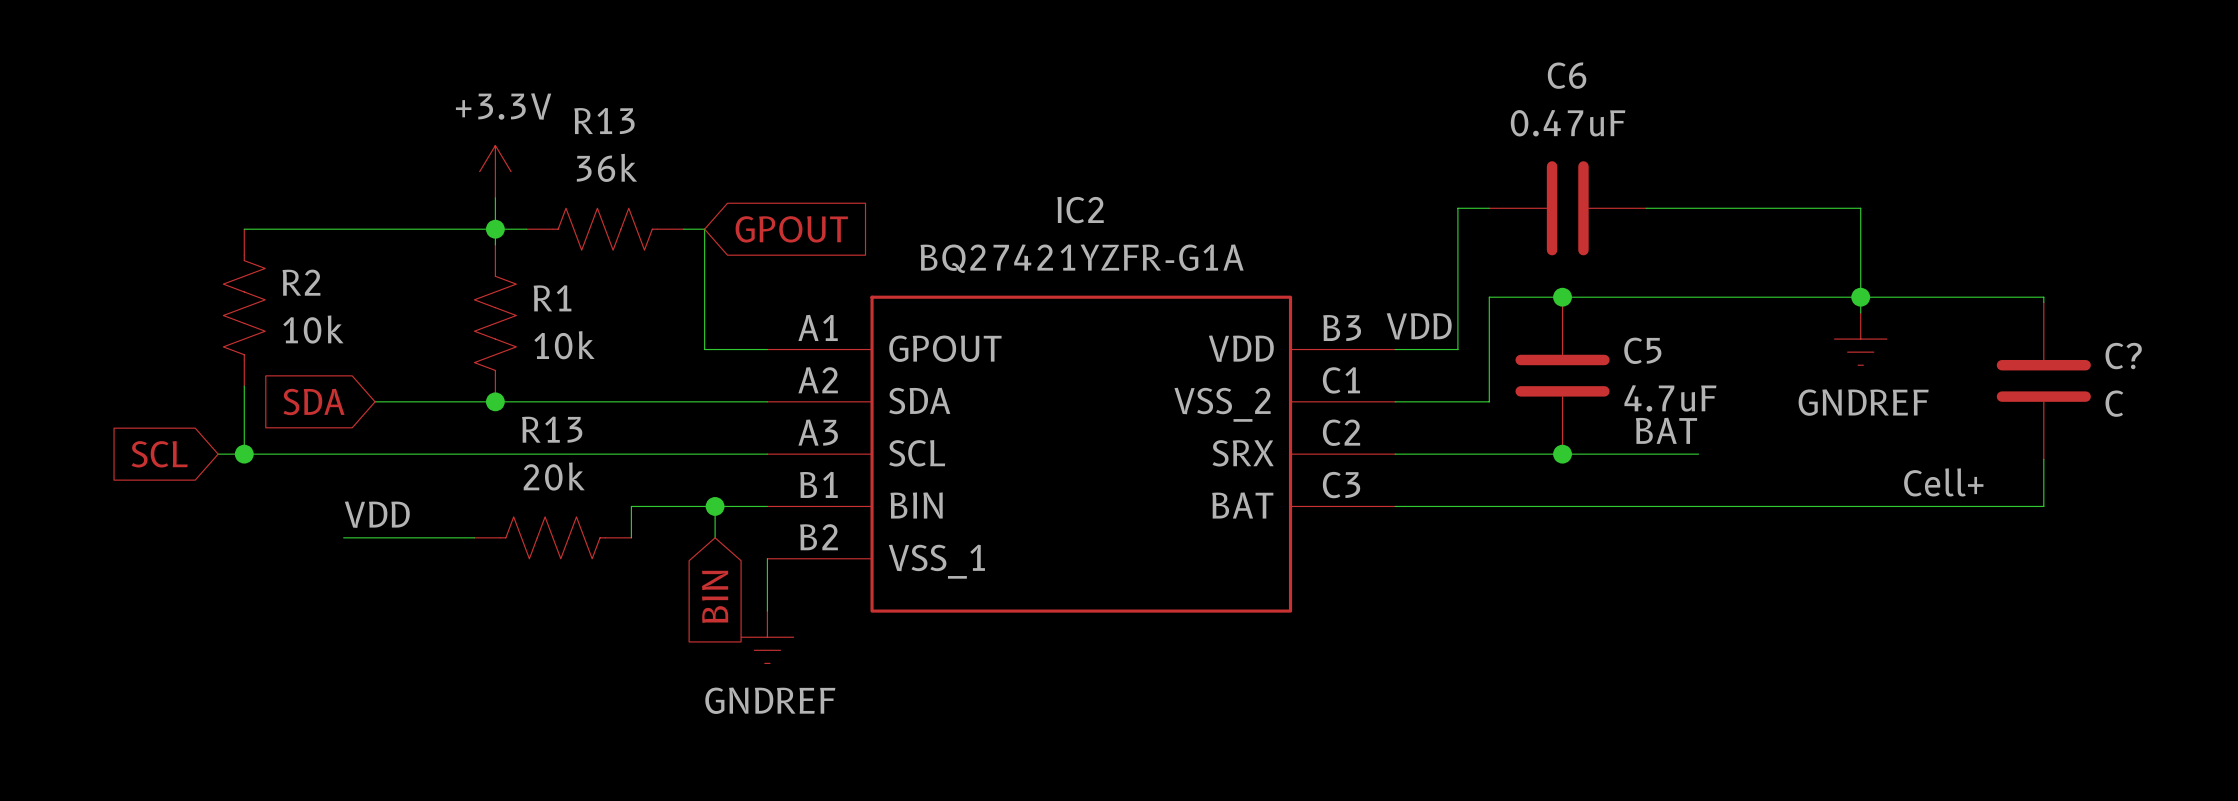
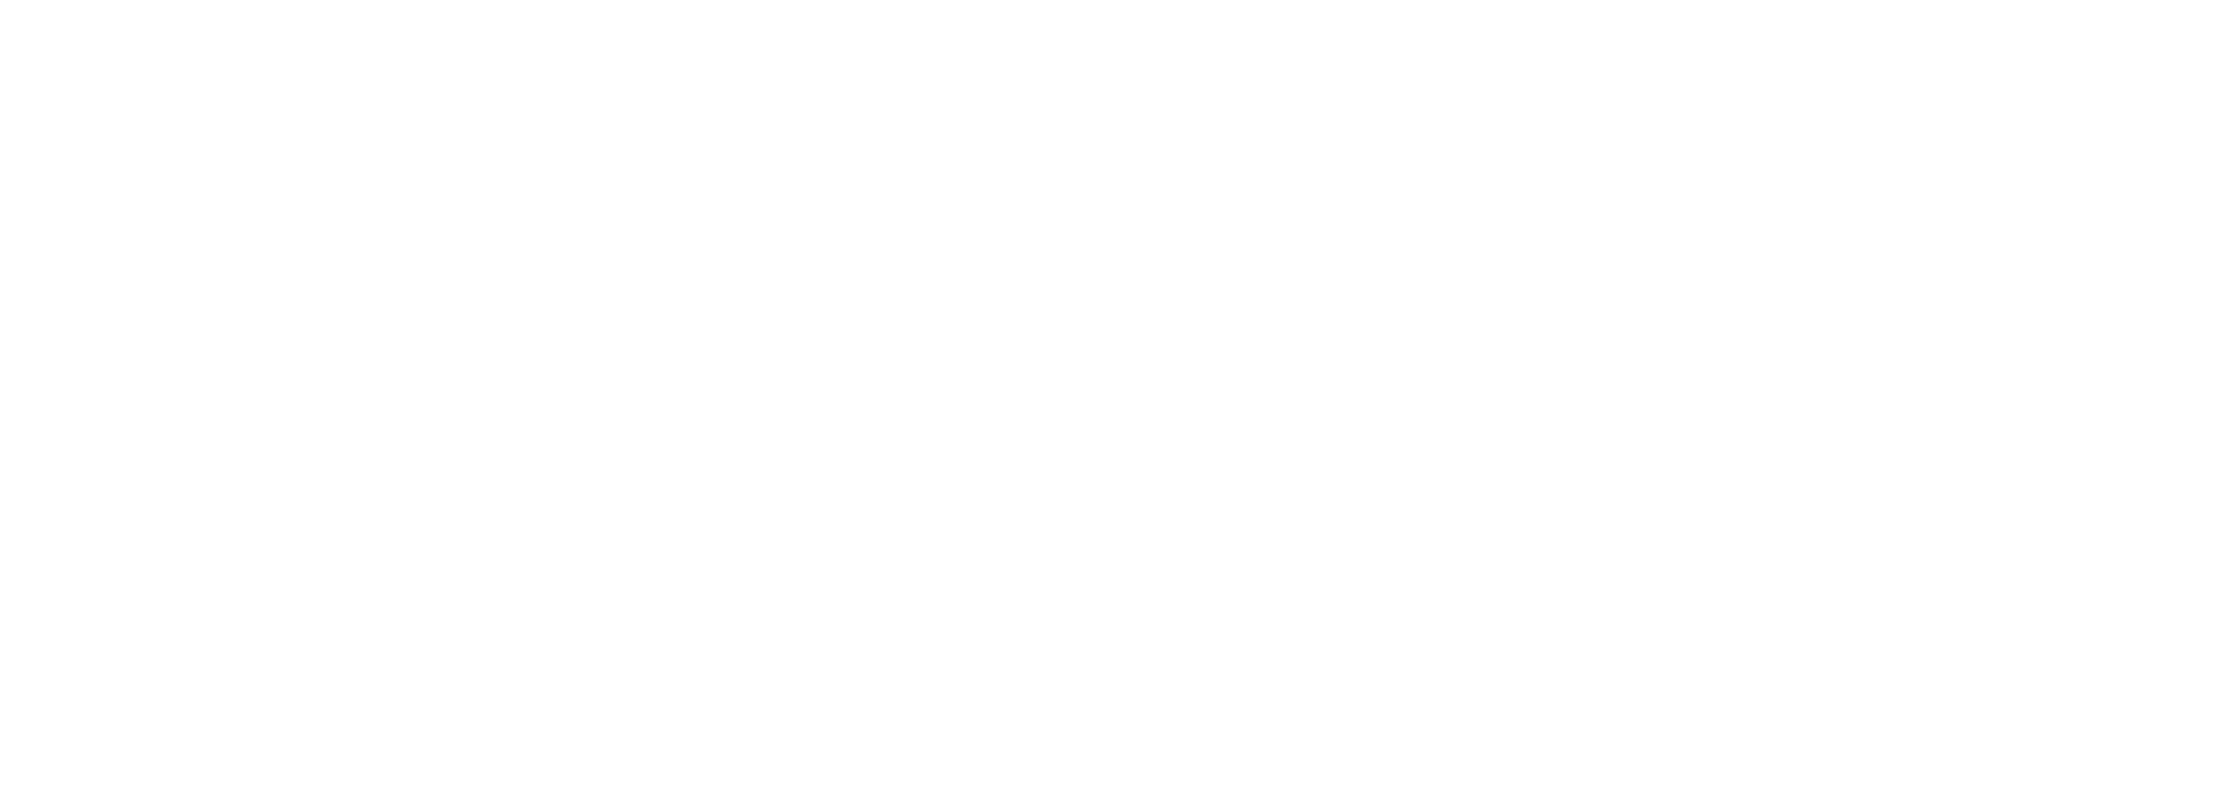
power symbol: +3.3V (495, 171) -> none
wire: (495, 197) (495, 244) -> none
wire: (1489, 208) (1457, 208) (1457, 349) (1395, 349) -> none
C6: 0.47uF (1567, 208) -> none
wire: (1646, 208) (1860, 208) (1860, 312) -> none
wire: (244, 229) (526, 229) -> none
junction: (495, 229) -> none
R13: 36k (605, 229) -> none
wire: (683, 229) (704, 229) (704, 349) (767, 349) -> none
global label: GPOUT (791, 229) -> none
junction: (1562, 297) -> none
junction: (1860, 297) -> none
wire: (2043, 302) (2043, 297) (1489, 297) (1489, 401) (1395, 401) -> none
R2: 10k (244, 307) -> none
R1: 10k (495, 323) -> none
label: VDD (1419, 326) -> none
power symbol: GNDREF (1860, 339) -> none
C5: 4.7uF (1562, 375) -> none
C?: C (2043, 380) -> none
wire: (244, 386) (244, 454) -> none
global label: SDA (313, 401) -> none
wire: (375, 401) (767, 401) -> none
junction: (495, 401) -> none
label: BAT (1666, 430) -> none
global label: SCL (159, 454) -> none
wire: (218, 454) (767, 454) -> none
junction: (244, 454) -> none
IC2: BQ27421YZFR-G1A (1081, 454) -> none
wire: (1395, 454) (1698, 454) -> none
junction: (1562, 454) -> none
wire: (2043, 459) (2043, 506) (1395, 506) -> none
label: Cell+ (1943, 482) -> none
wire: (715, 506) (715, 537) -> none
junction: (715, 506) -> none
wire: (767, 506) (631, 506) (631, 537) -> none
label: VDD (377, 514) -> none
wire: (343, 537) (474, 537) -> none
R13: 20k (552, 537) -> none
wire: (767, 558) (767, 611) -> none
global label: BIN (715, 596) -> none
power symbol: GNDREF (767, 637) -> none

